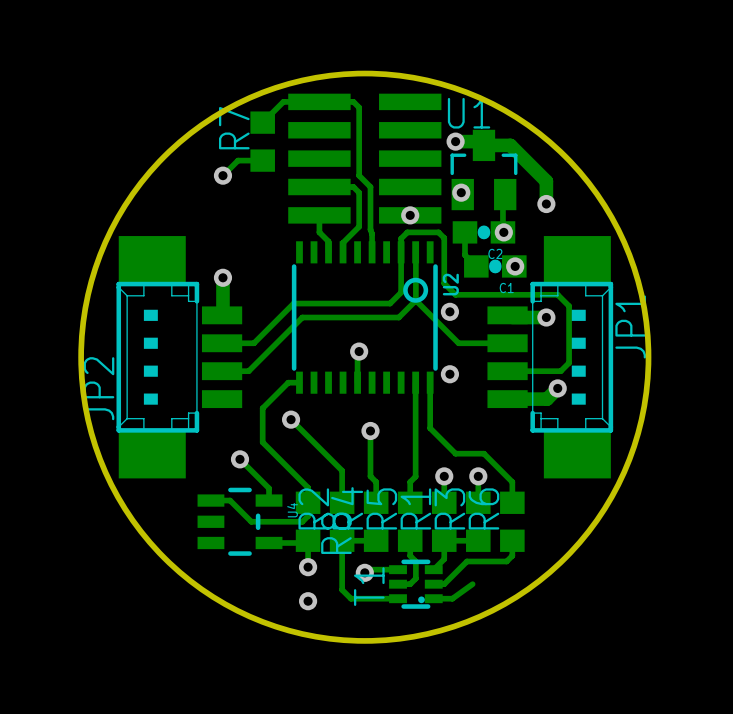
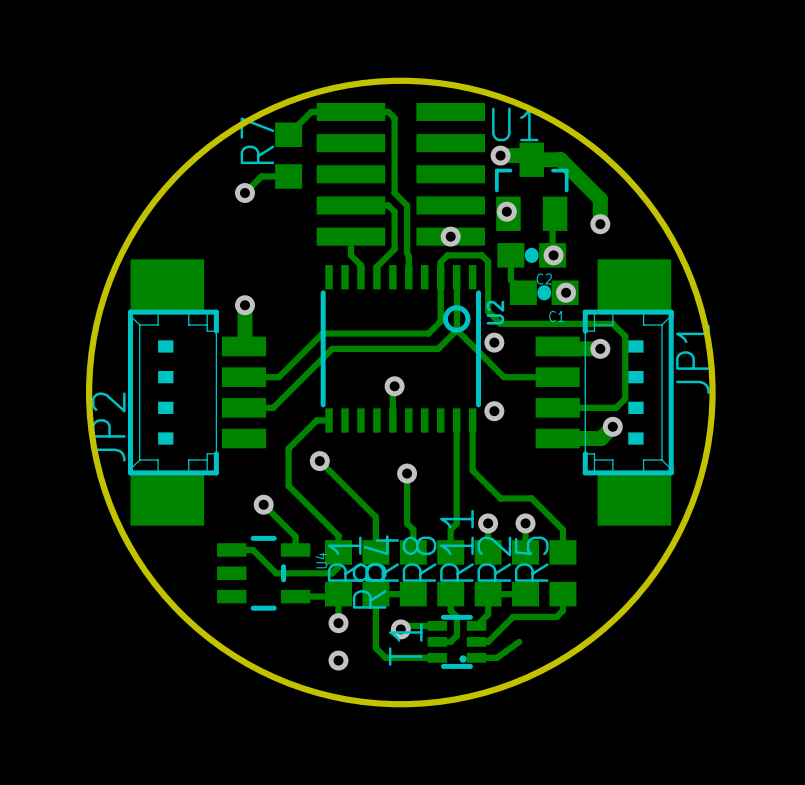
R2 name: R2 (313, 508) -> R1 (344, 559)
R5 name: R5 (381, 508) -> R8 (419, 559)
R1 name: R1 (415, 508) -> R11 (456, 545)
R3 name: R3 (449, 508) -> R2 (494, 559)
R6 name: R6 (483, 508) -> R5 (531, 559)

